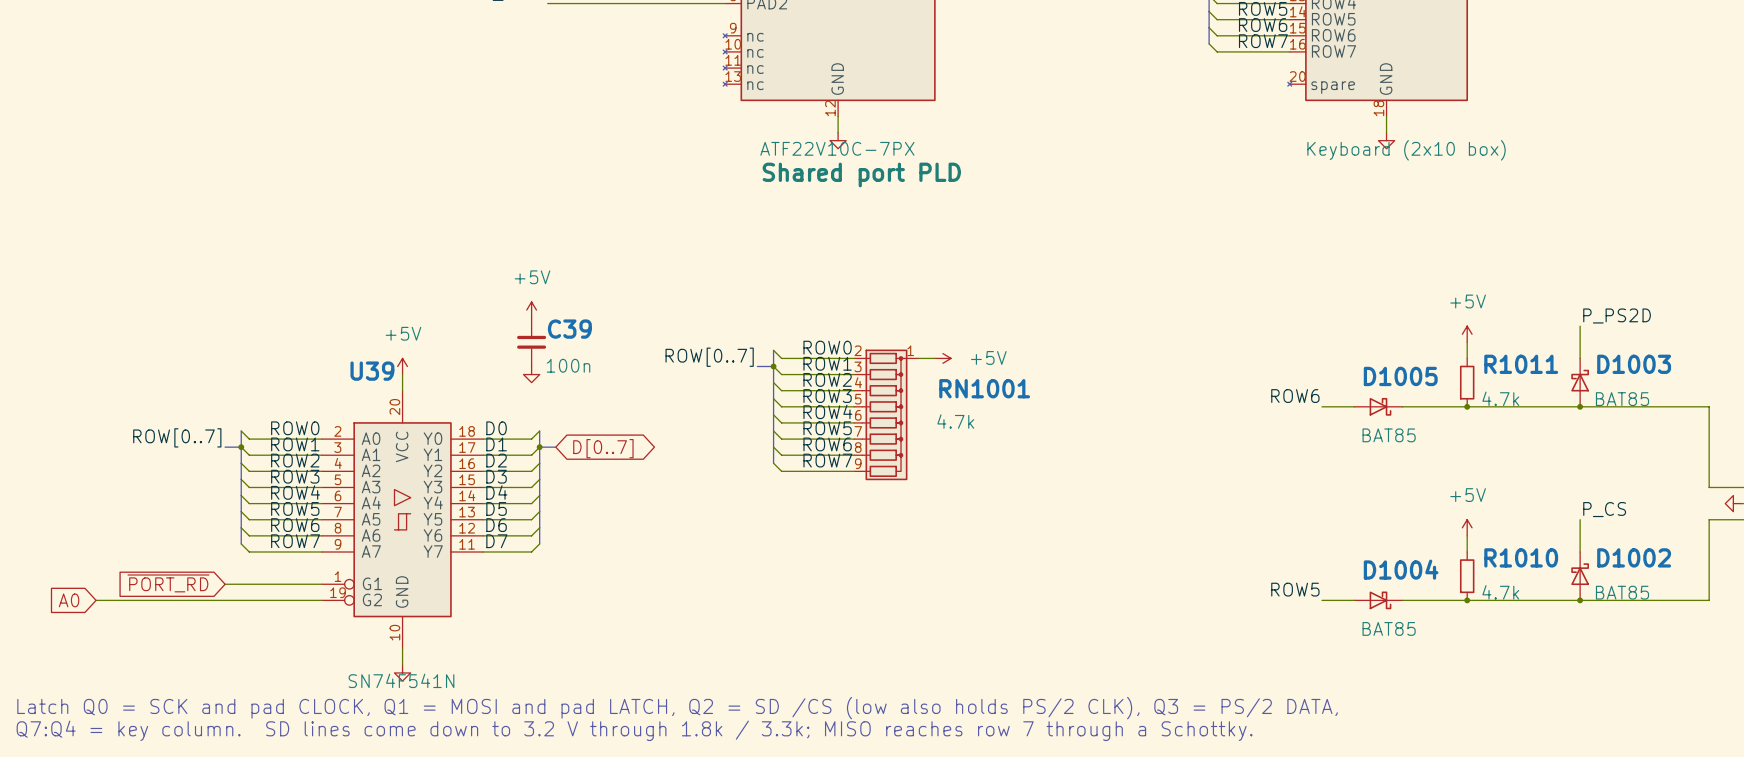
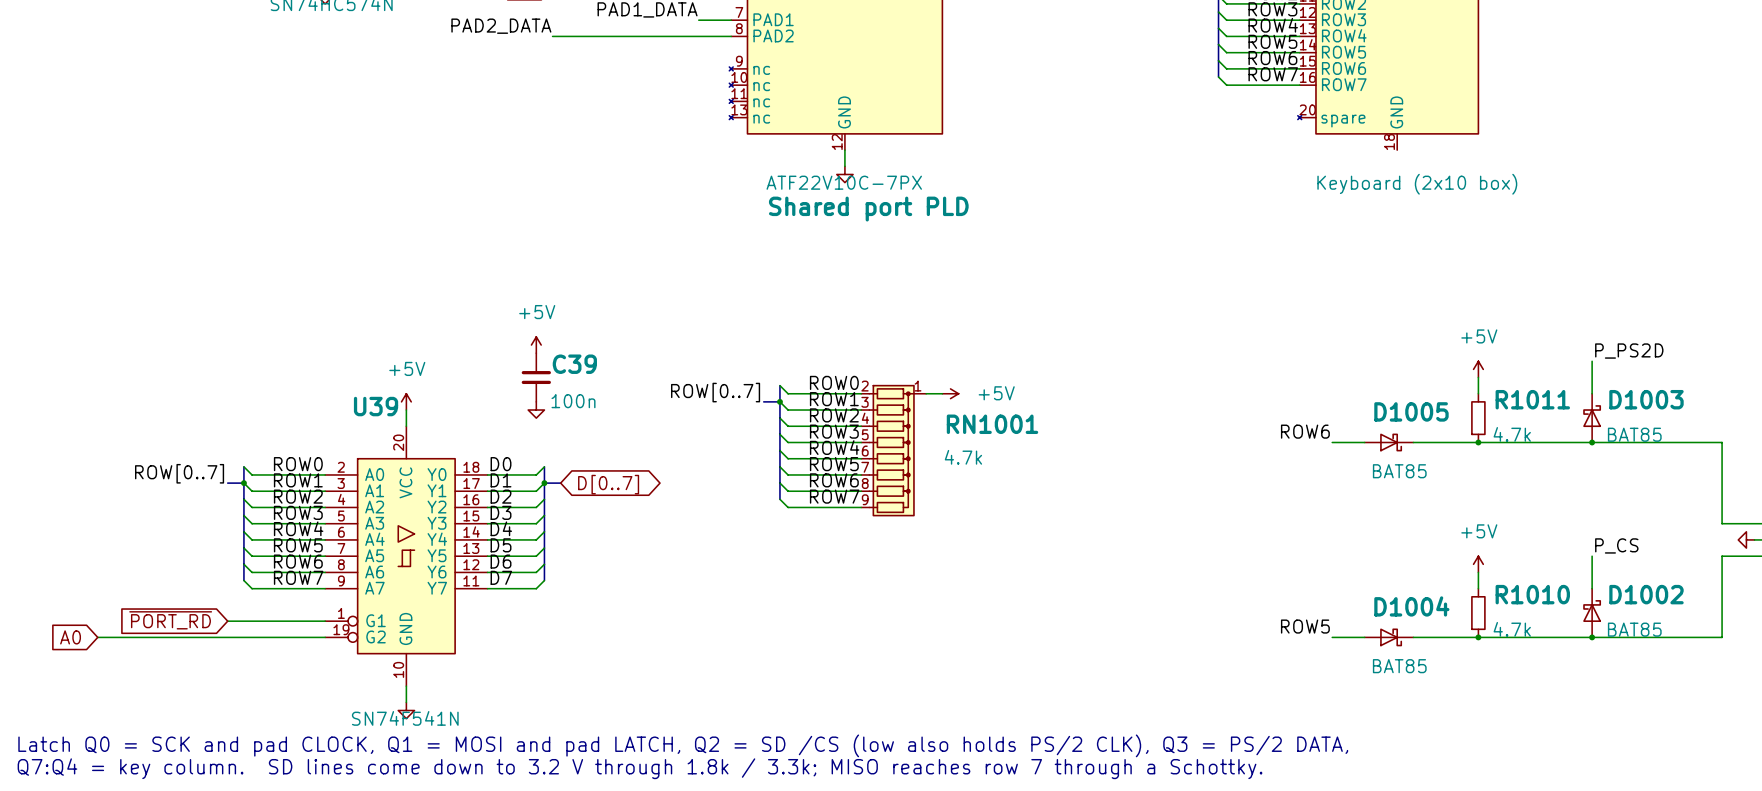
wire: (1386, 116) (1386, 132) -> none
power symbol: (1386, 140) -> none

